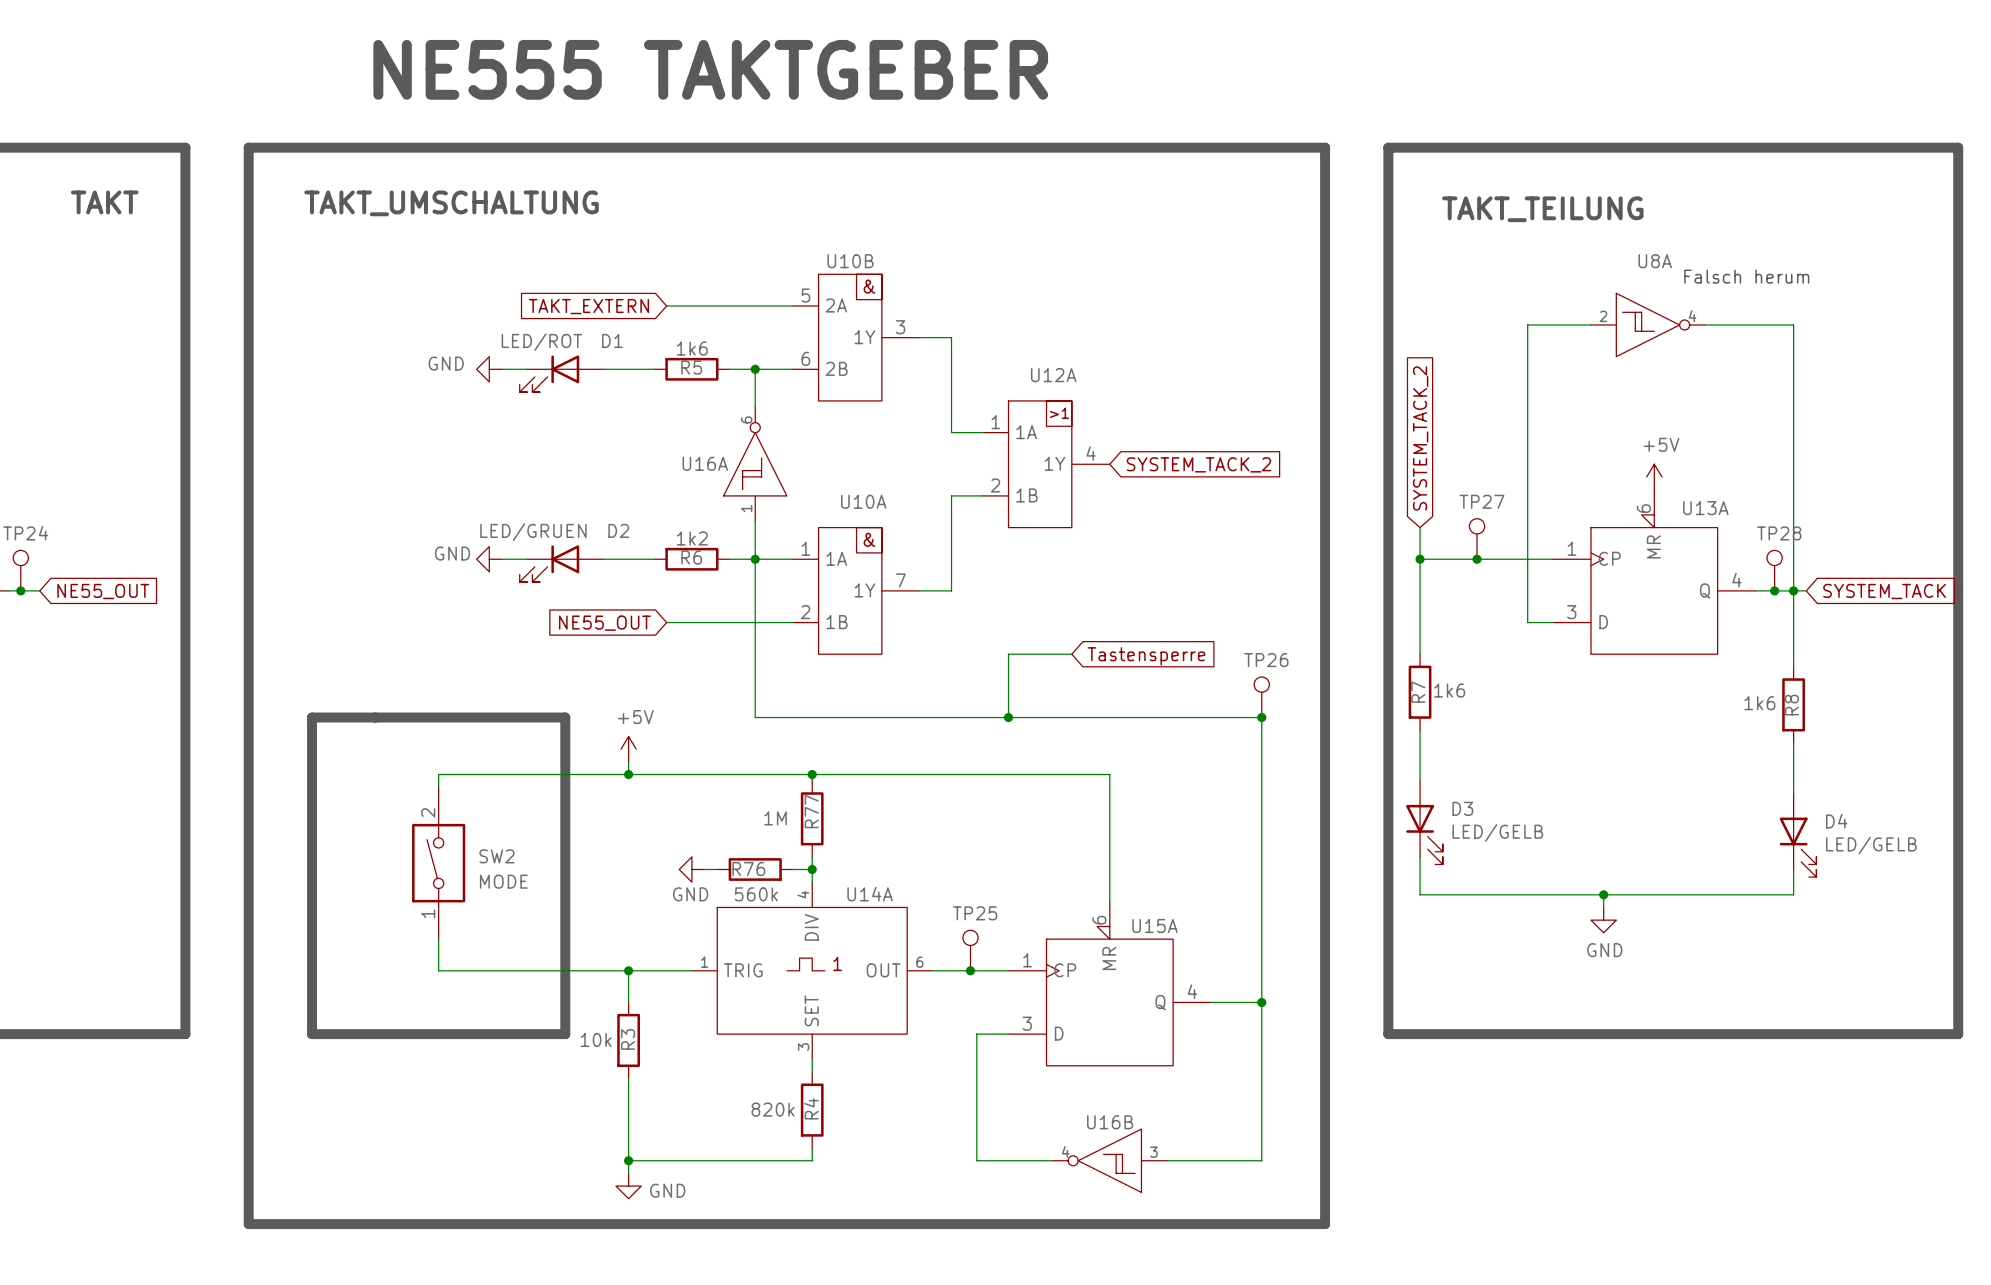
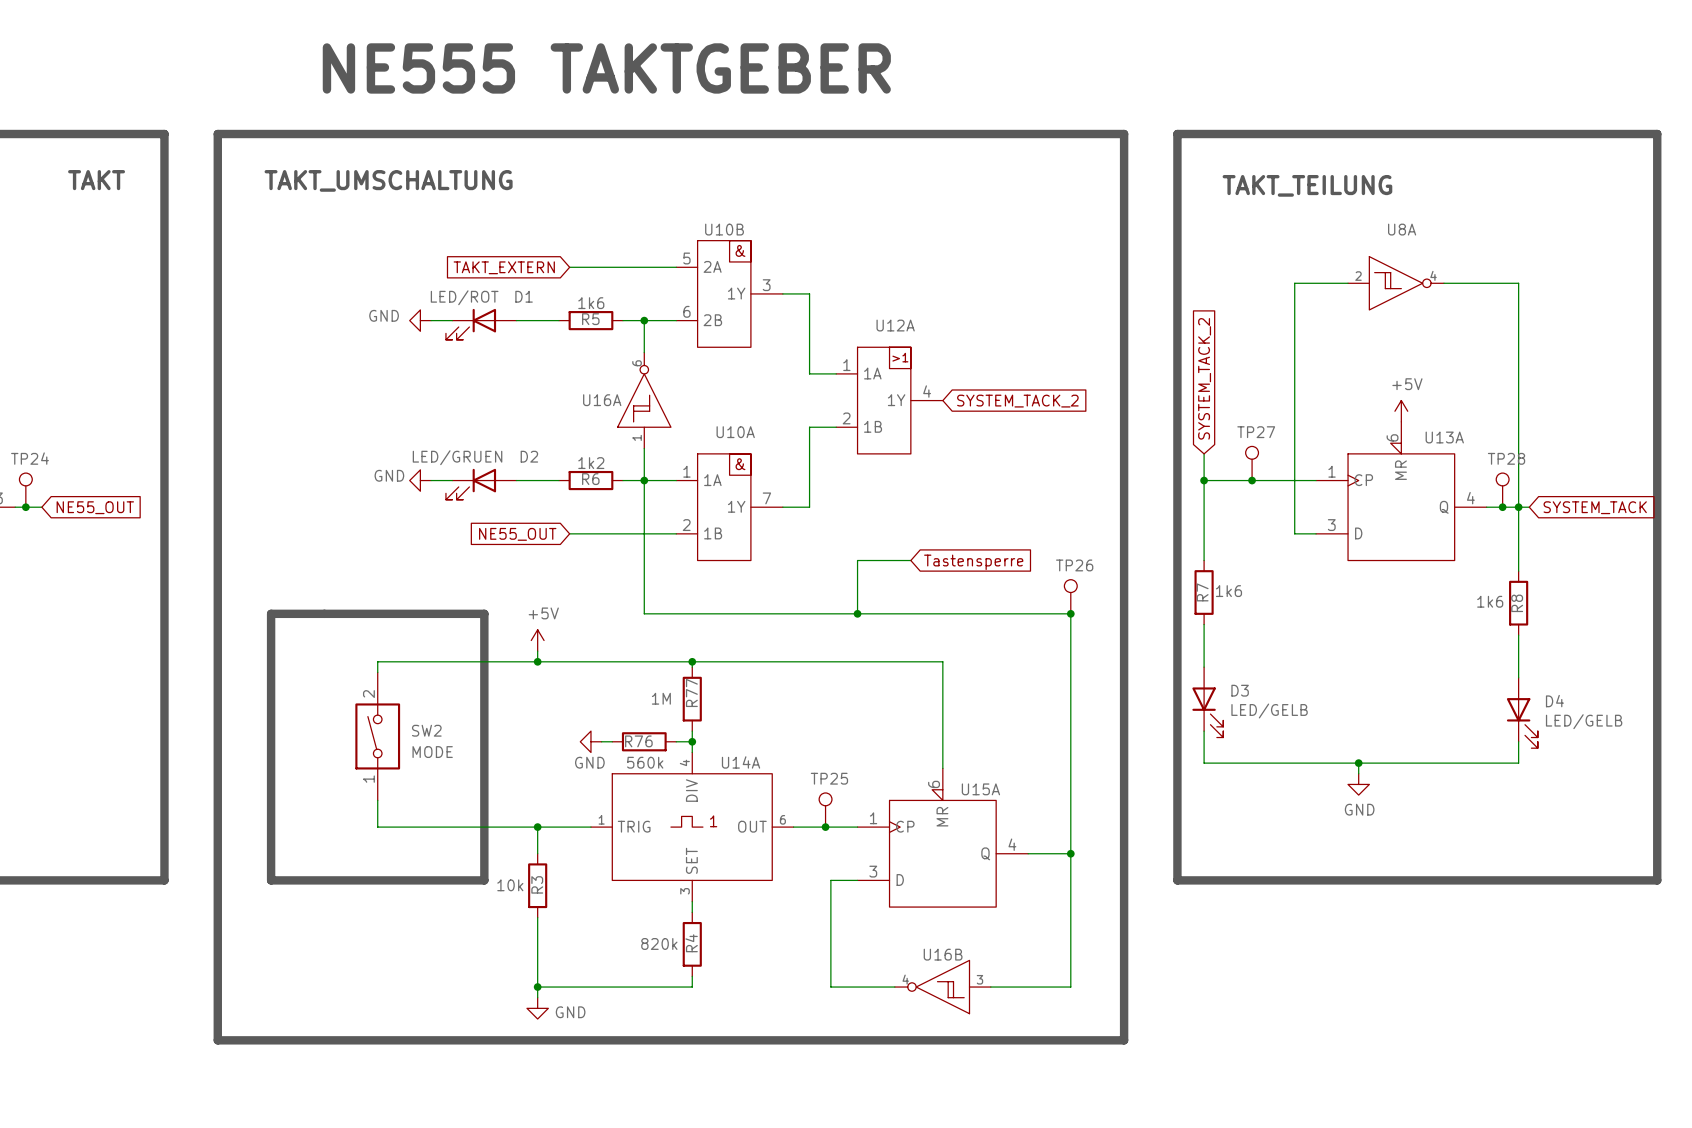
text: Falsch herum (1746, 276) -> none

